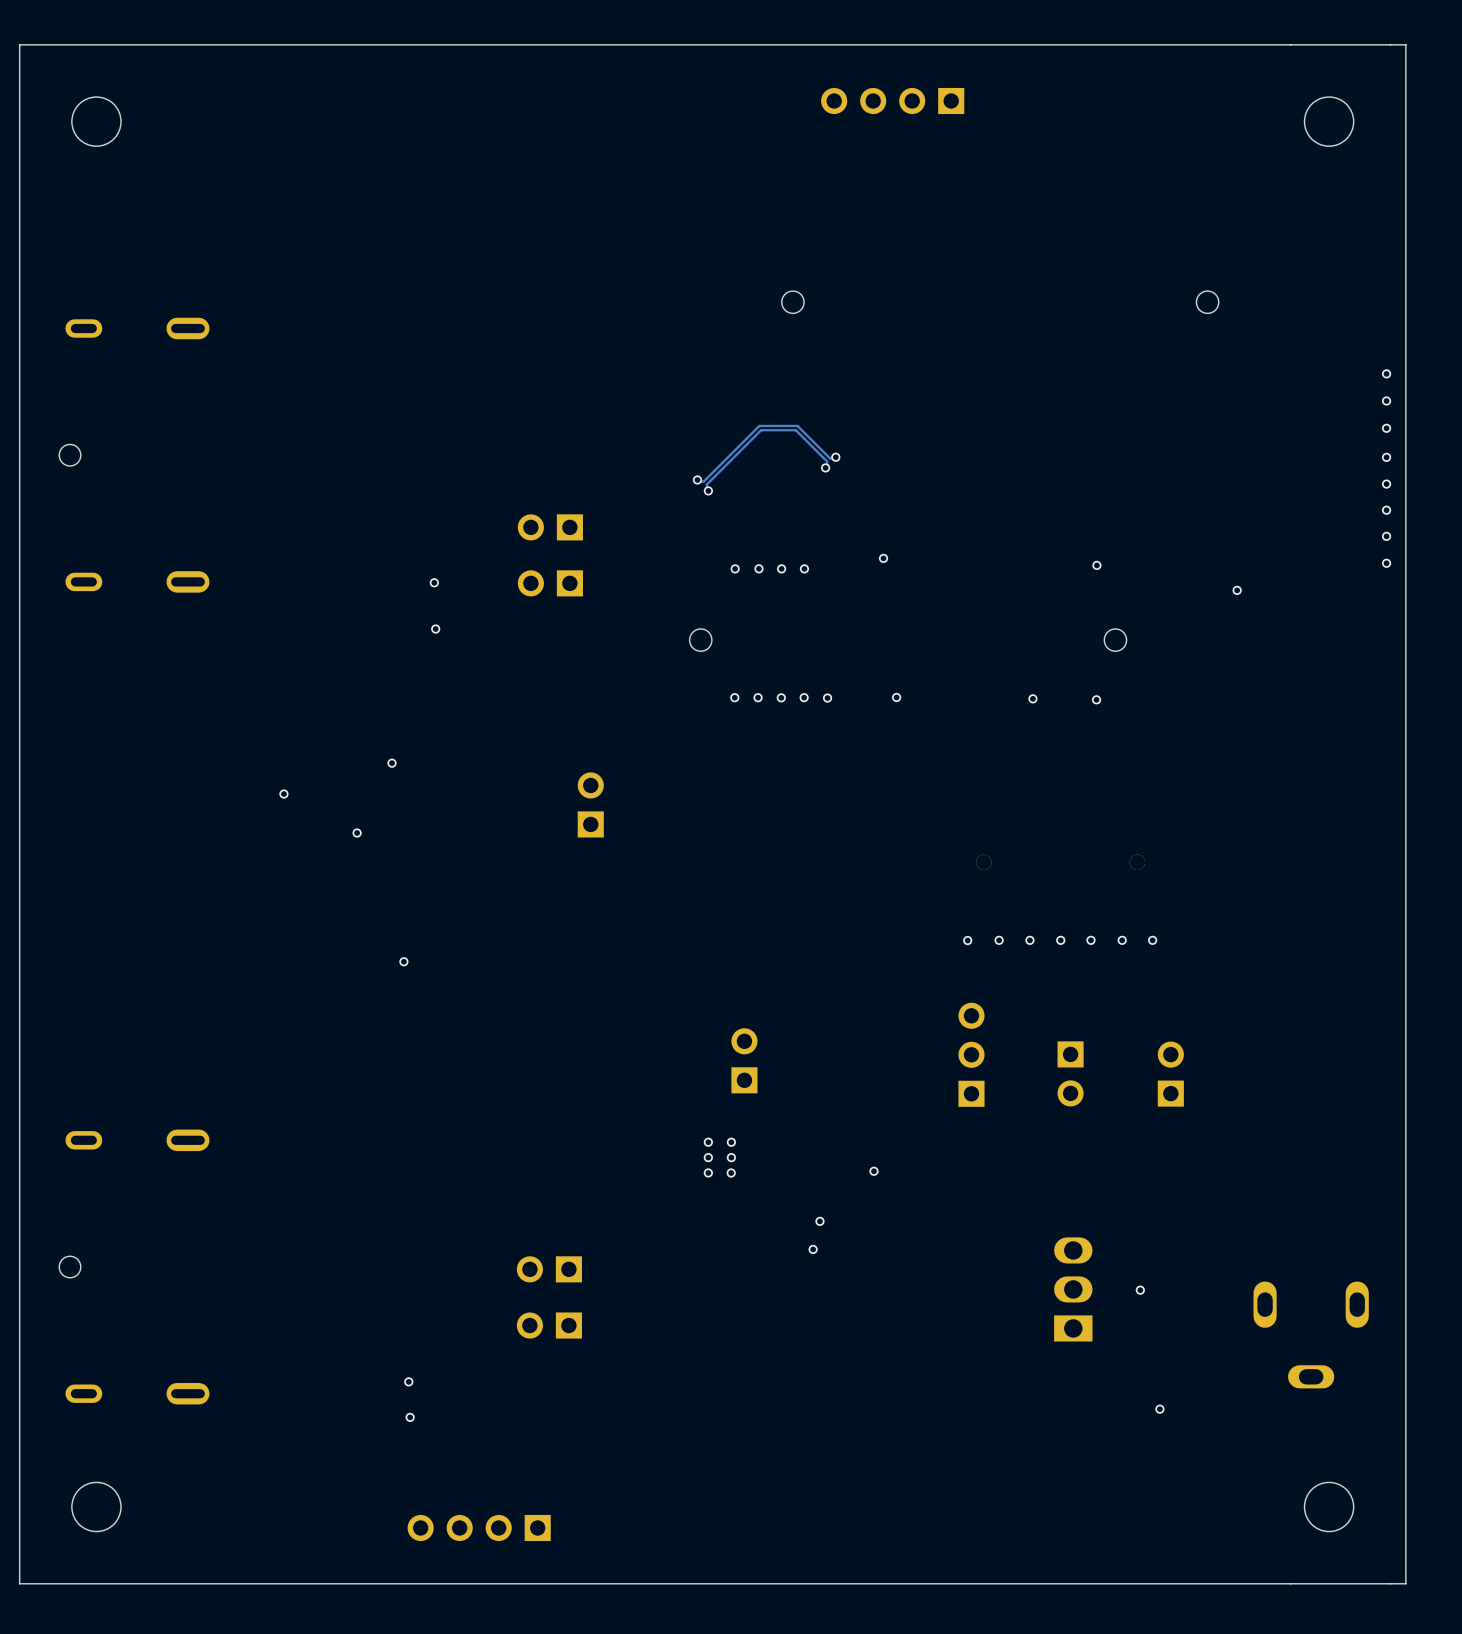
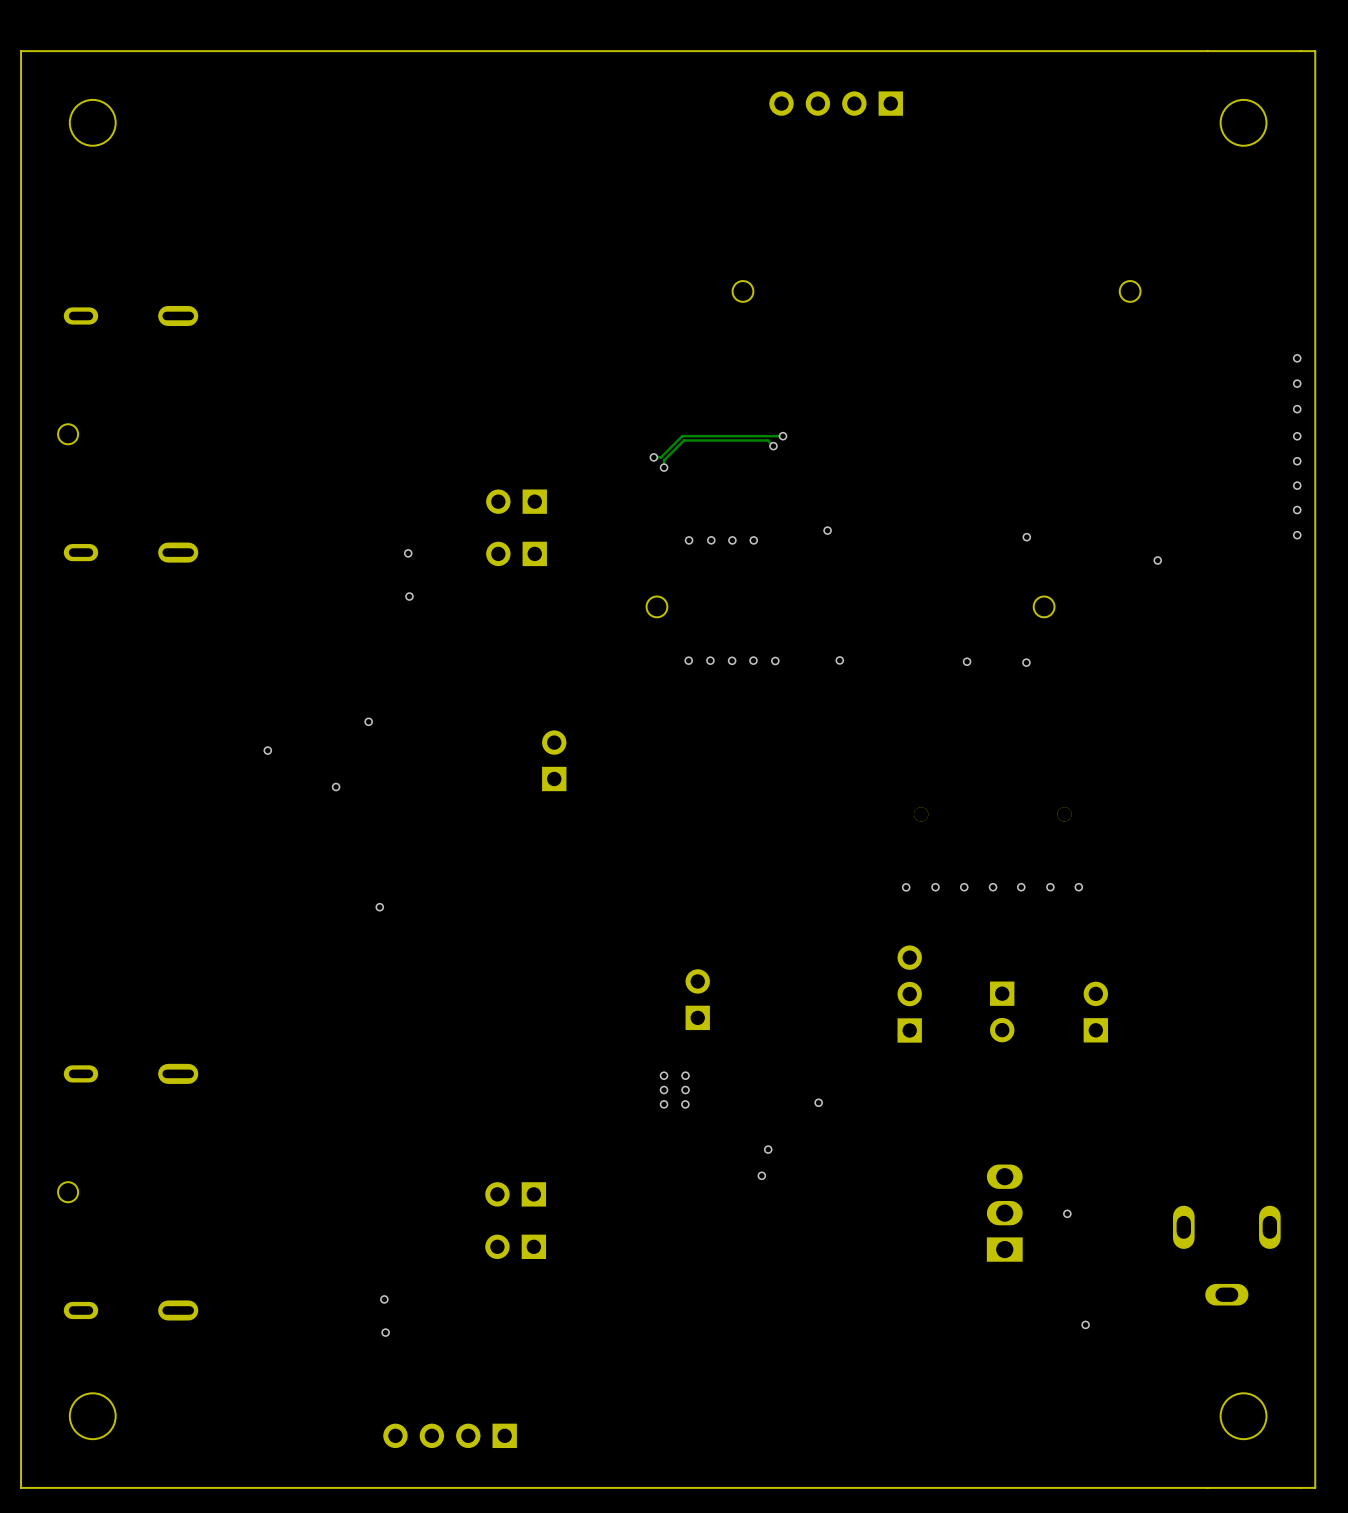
track: none -> (783, 436) (682, 436) (661, 457) (653, 457)
track: (835, 458) (830, 458) (797, 425) (759, 425) (703, 481) (698, 481) -> none
track: (827, 466) (827, 461) (795, 430) (761, 430) (706, 484) (706, 489) -> none
track: none -> (773, 446) (767, 440) (684, 440) (664, 460) (664, 467)

